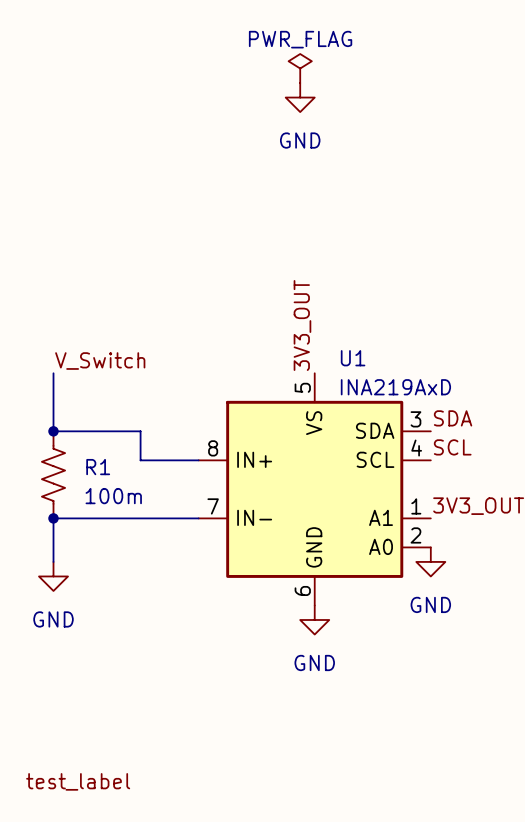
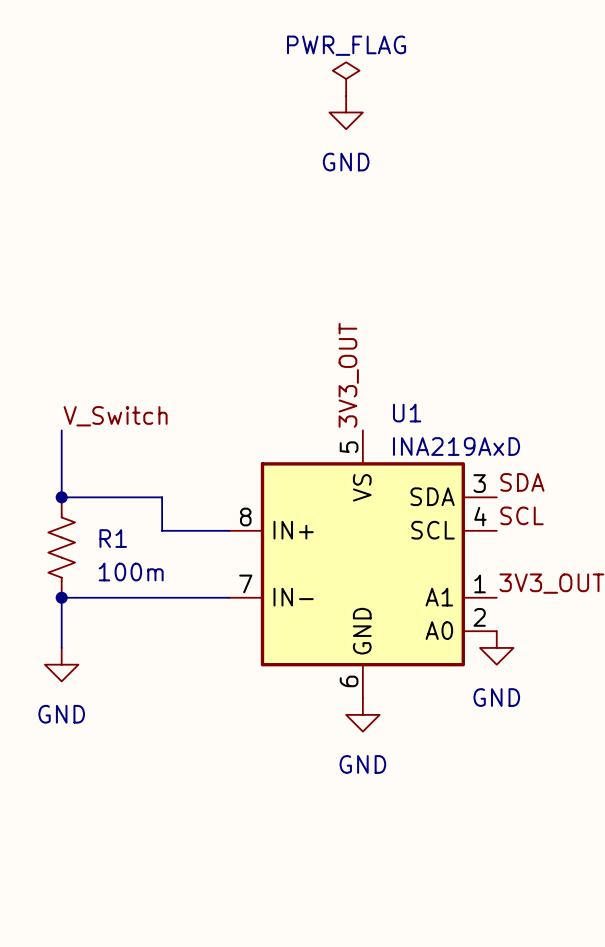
label: test_label (78, 781) -> none

